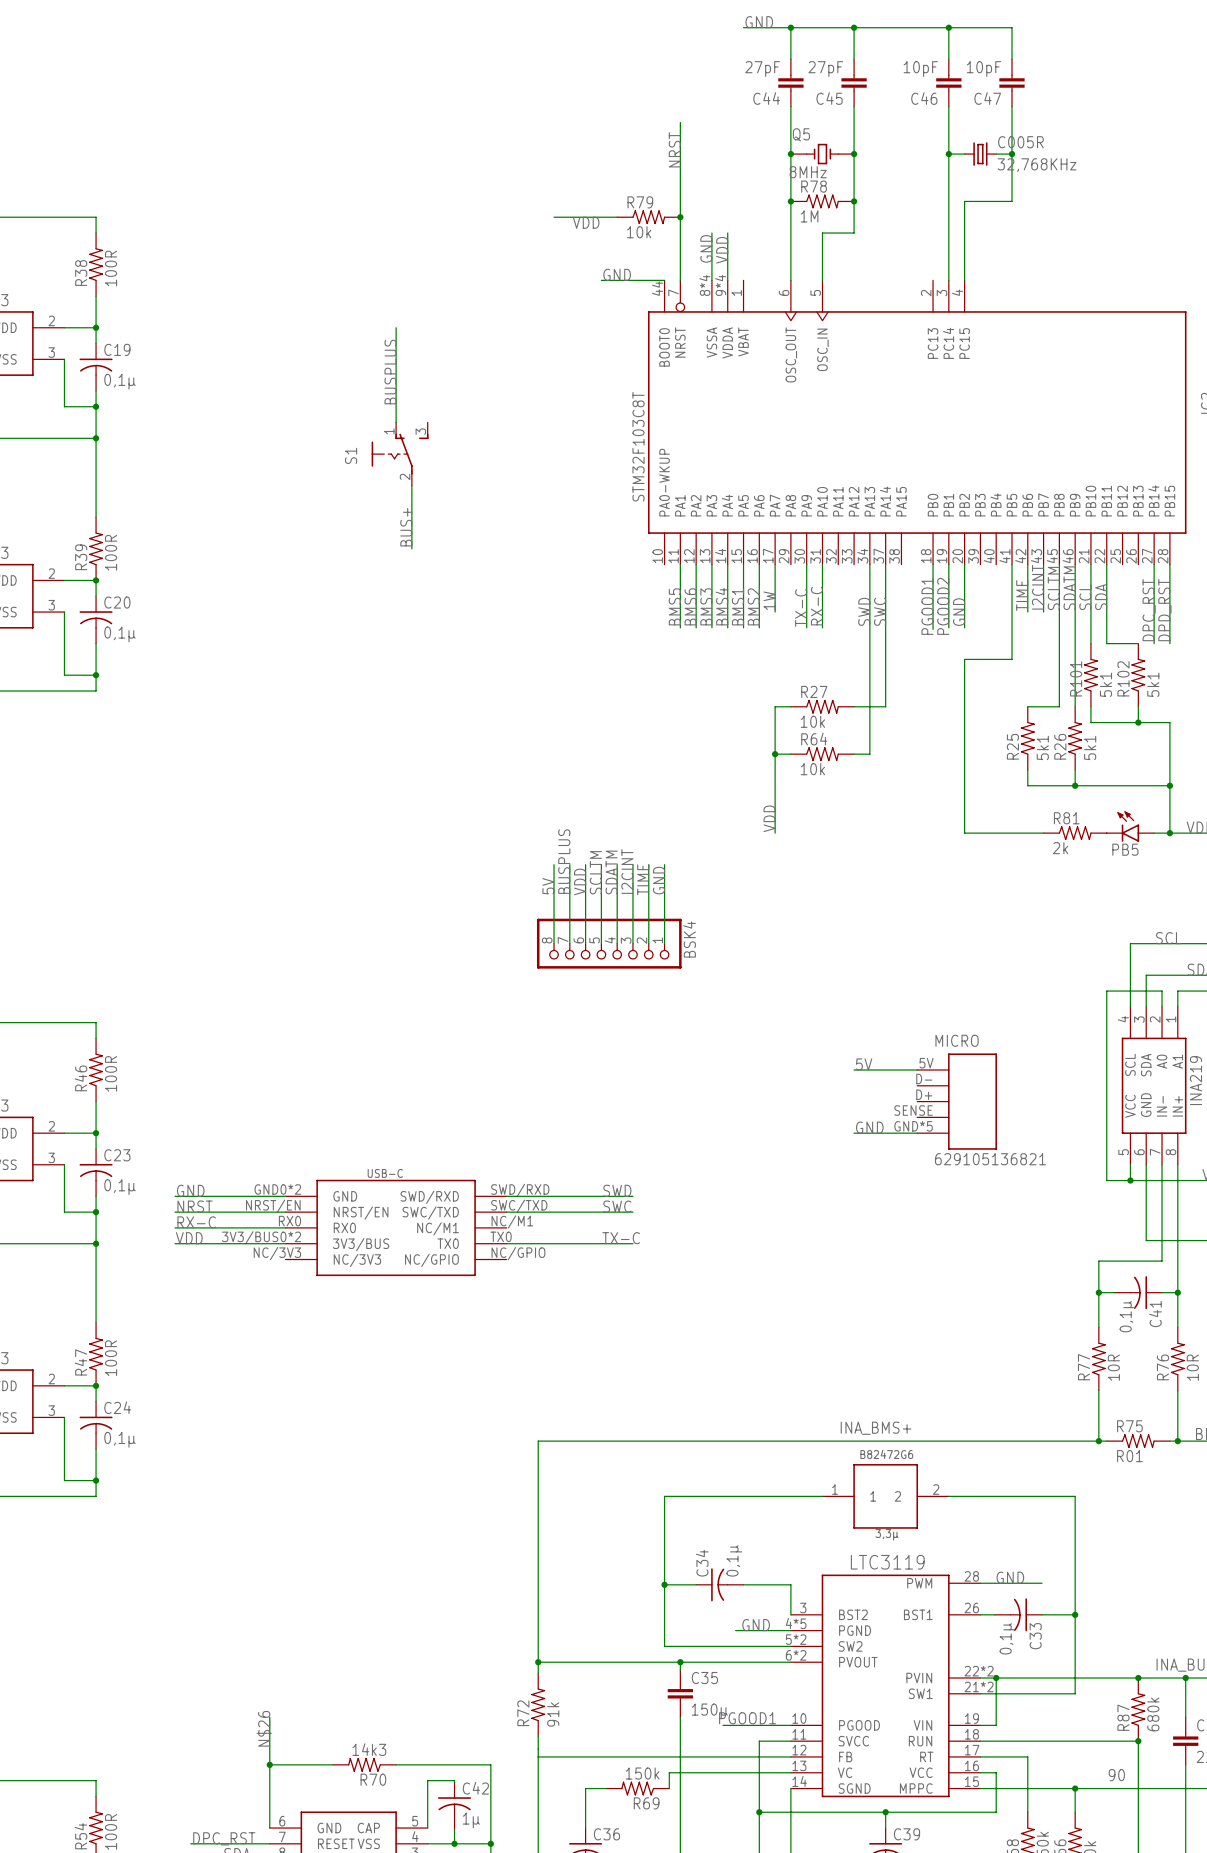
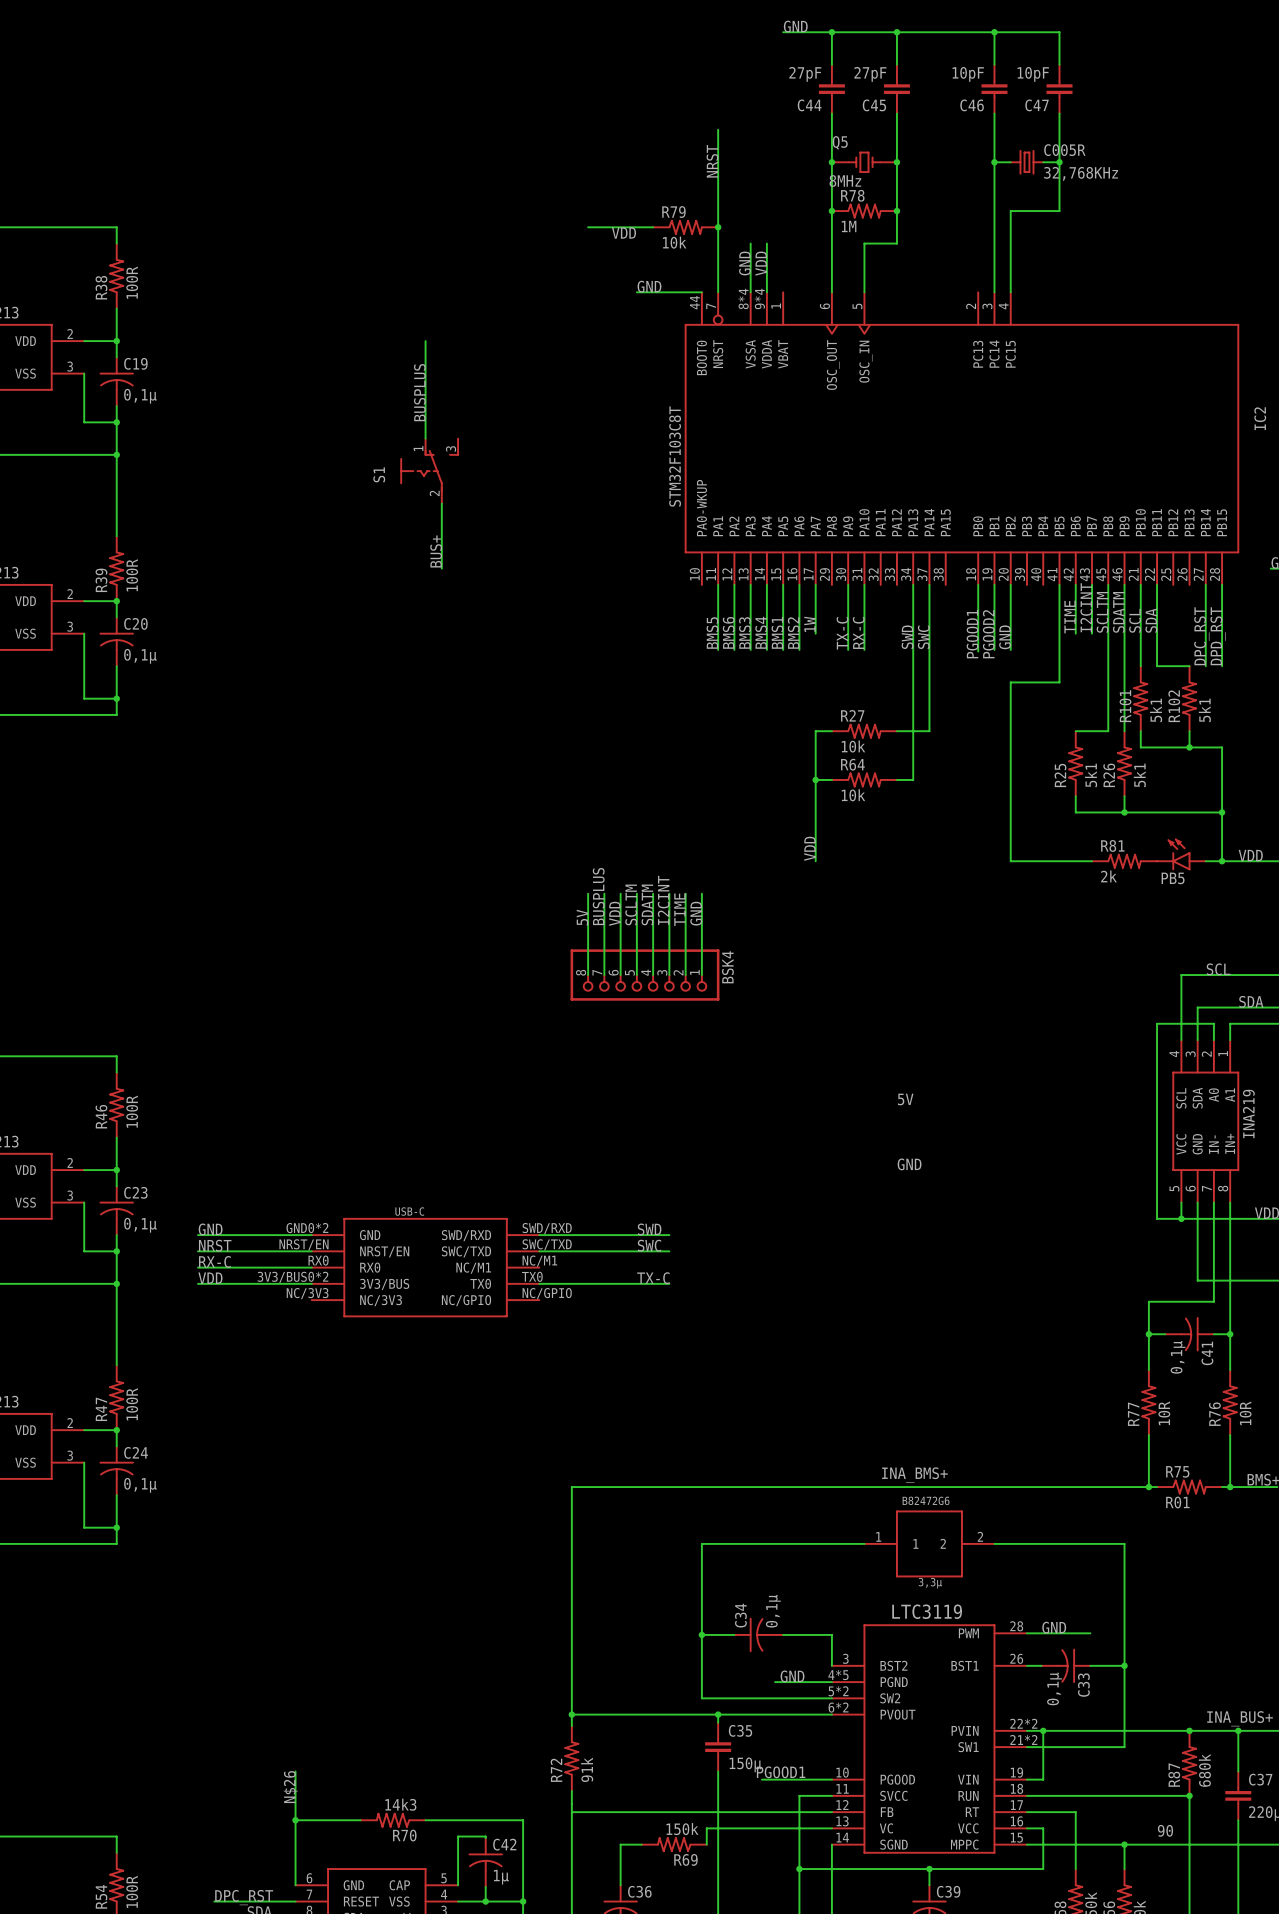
wire: (854, 1070) (917, 1070) -> none
MICRO: 629105136821 (957, 1101) -> none
wire: (854, 1133) (917, 1133) -> none

